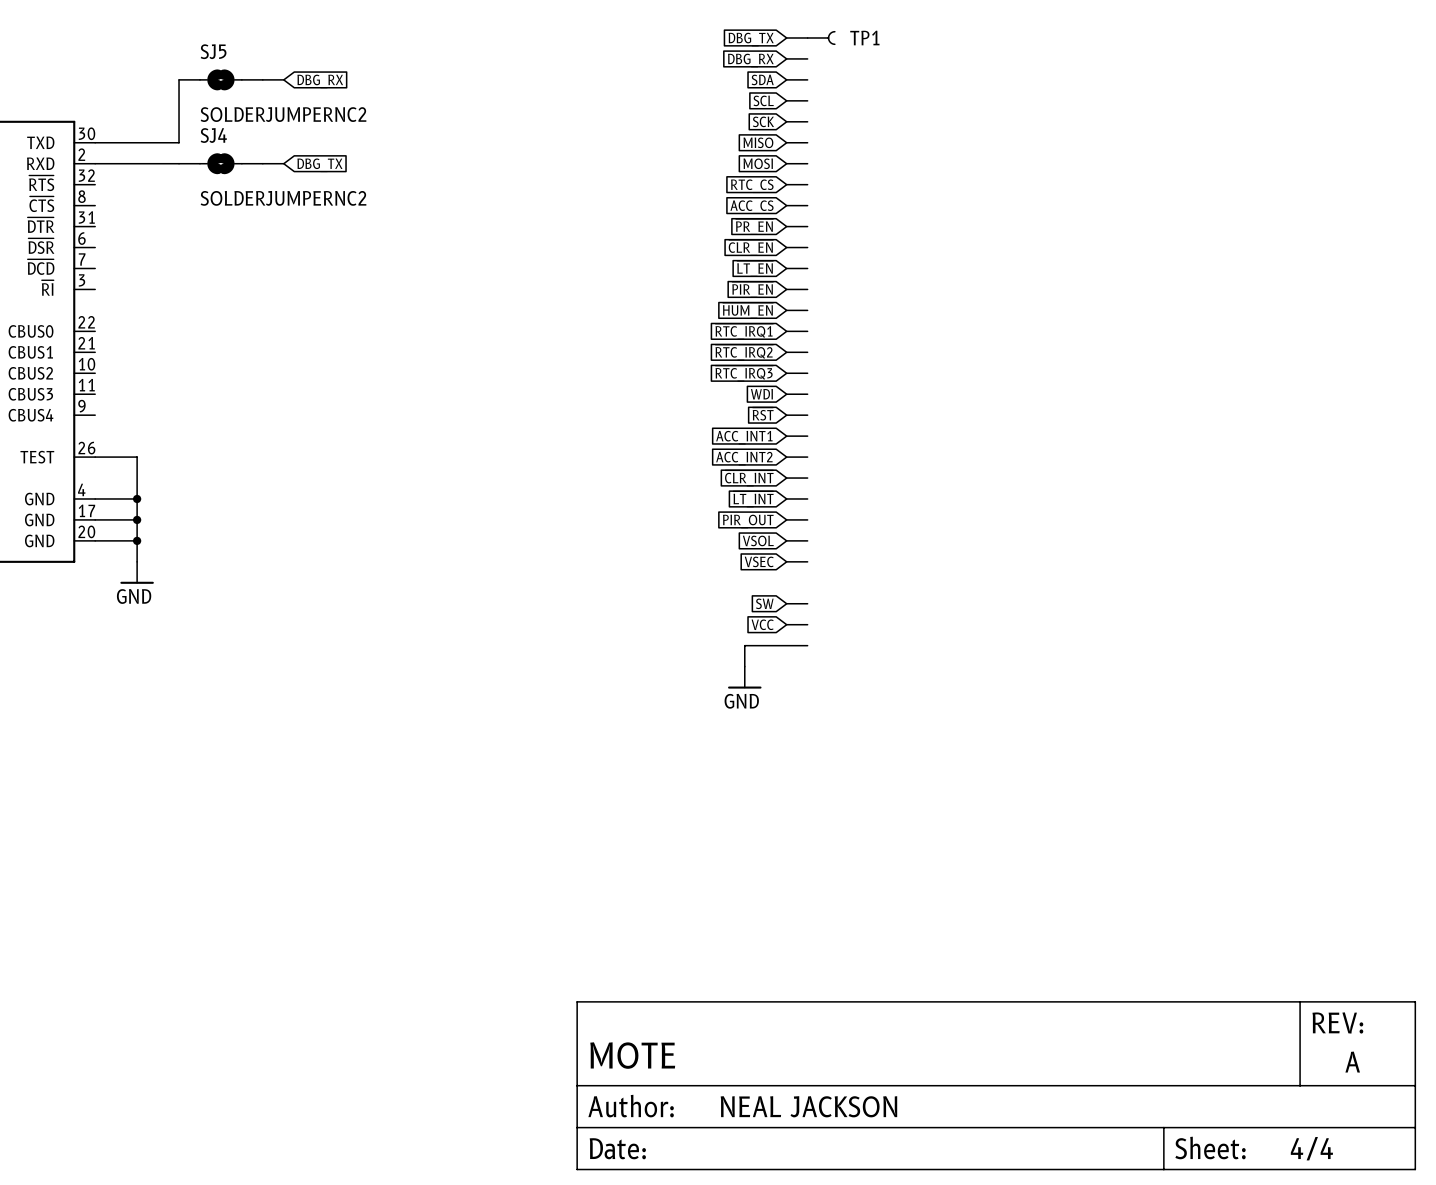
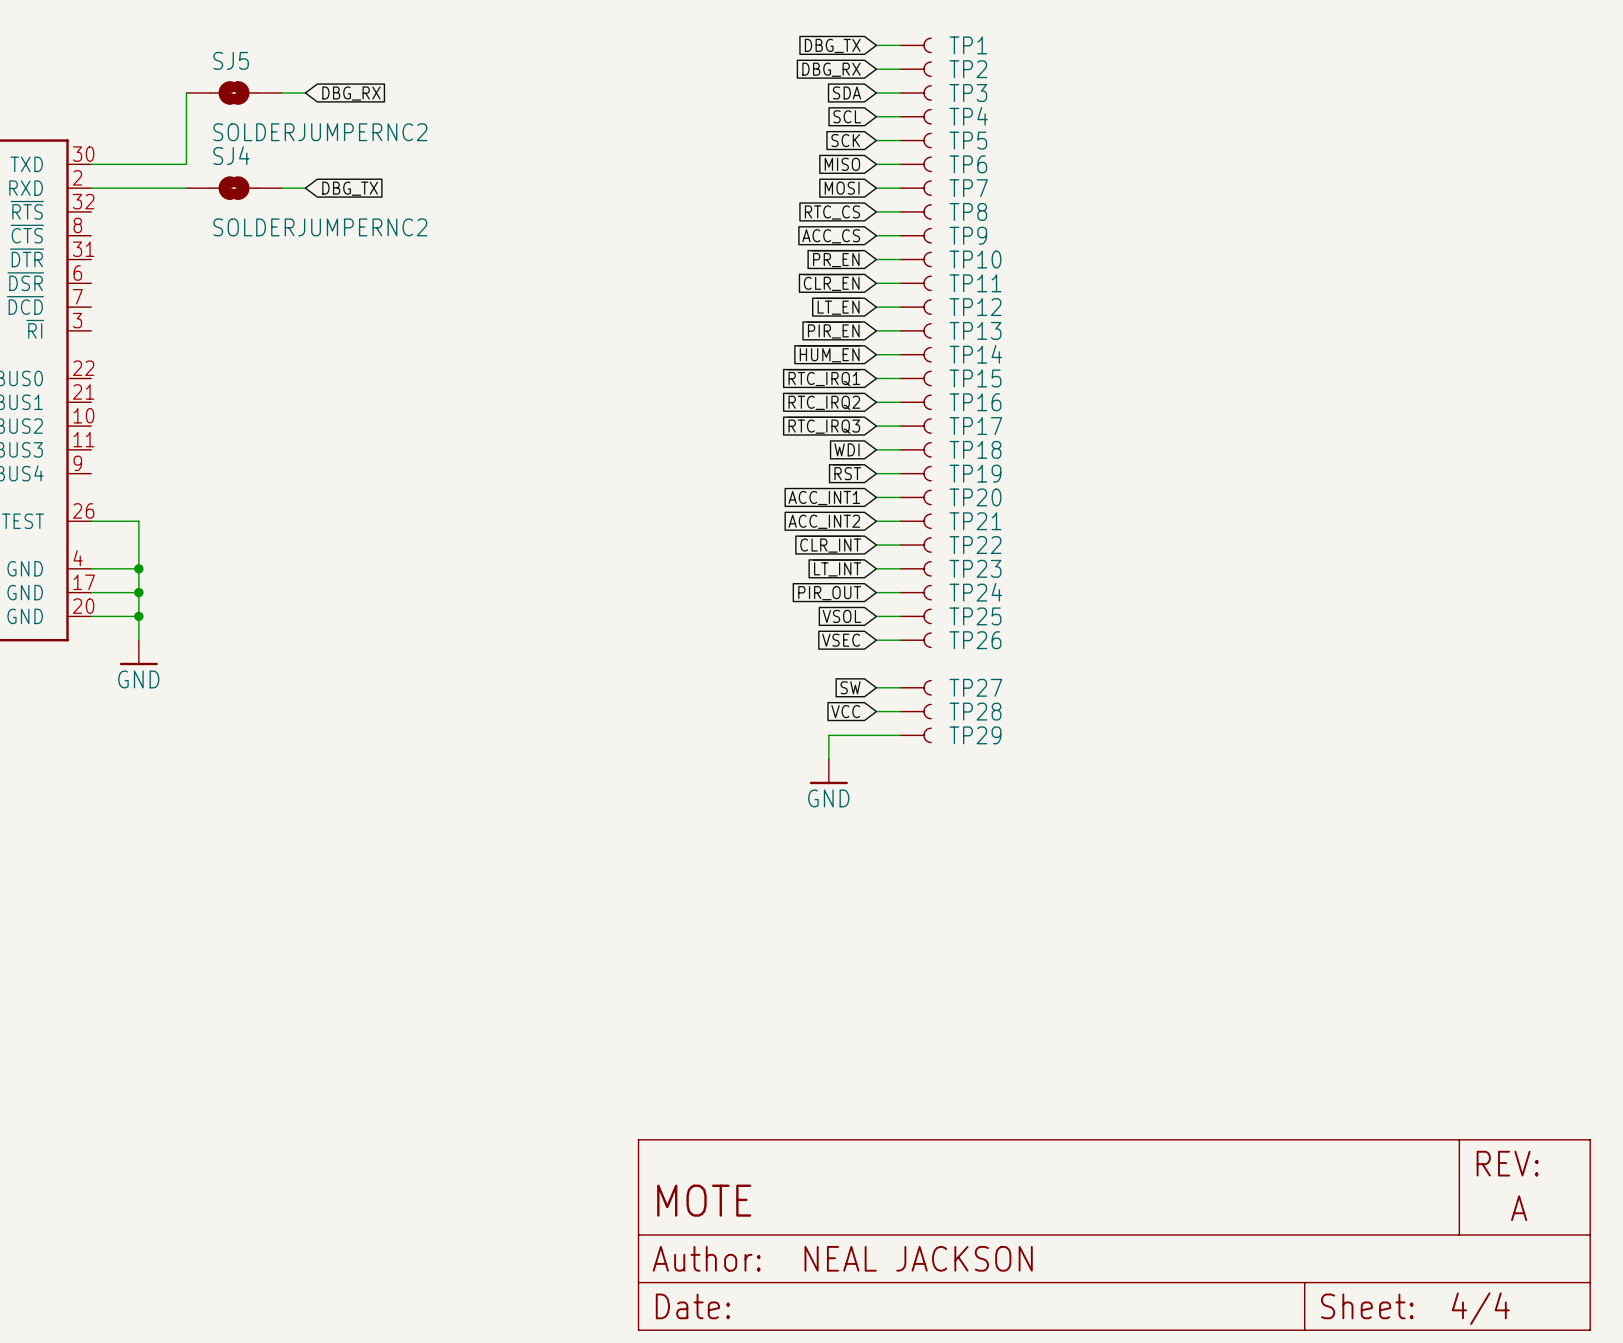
TP2: none -> (915, 69)
TP3: none -> (915, 92)
TP4: none -> (915, 116)
TP5: none -> (915, 140)
TP6: none -> (915, 164)
TP7: none -> (915, 188)
TP8: none -> (915, 211)
TP9: none -> (915, 235)
TP10: none -> (915, 259)
TP11: none -> (915, 283)
TP12: none -> (915, 307)
TP13: none -> (915, 330)
TP14: none -> (915, 354)
TP15: none -> (915, 378)
TP16: none -> (915, 402)
TP17: none -> (915, 426)
TP18: none -> (915, 449)
TP19: none -> (915, 473)
TP20: none -> (915, 497)
TP21: none -> (915, 521)
TP22: none -> (915, 545)
TP23: none -> (915, 568)
TP24: none -> (915, 592)
TP25: none -> (915, 616)
TP26: none -> (915, 640)
TP27: none -> (915, 687)
TP28: none -> (915, 711)
TP29: none -> (915, 735)

